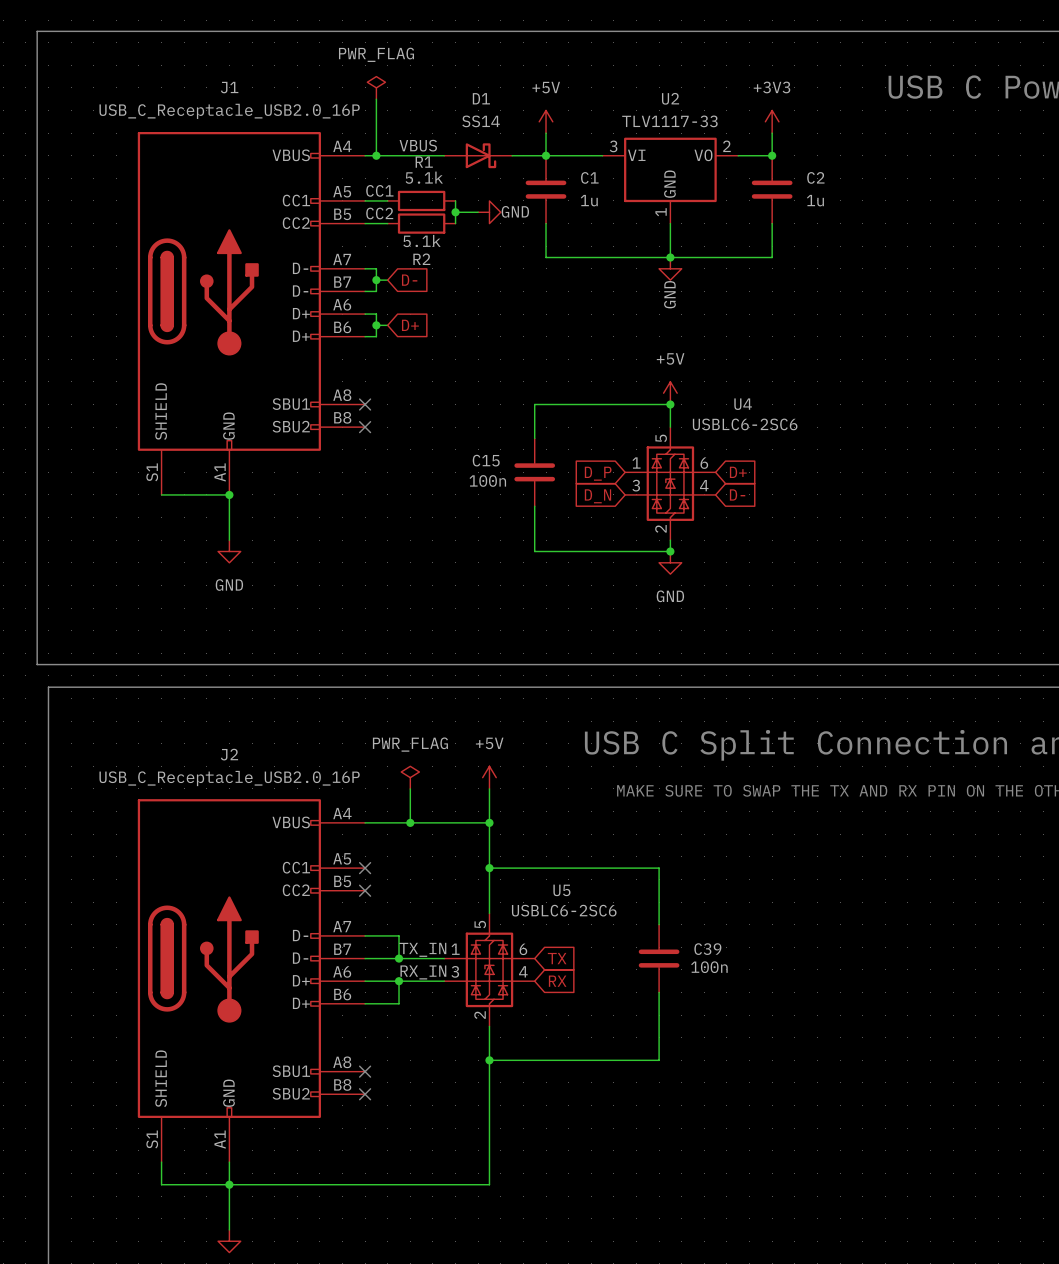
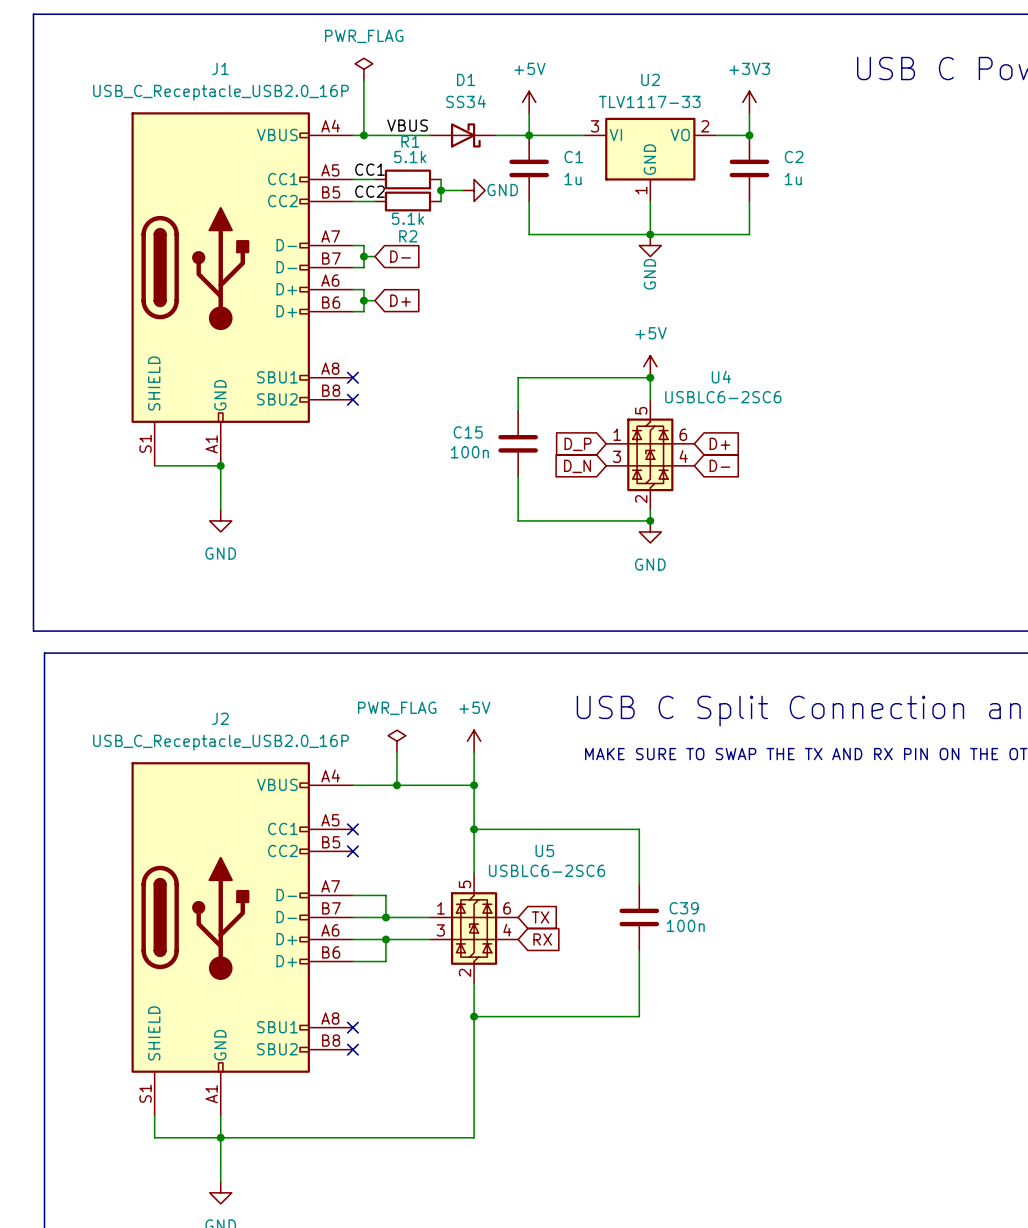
D1 value: SS14 (481, 121) -> SS34 (466, 101)
label: TX_IN (422, 949) -> none
label: RX_IN (423, 972) -> none

